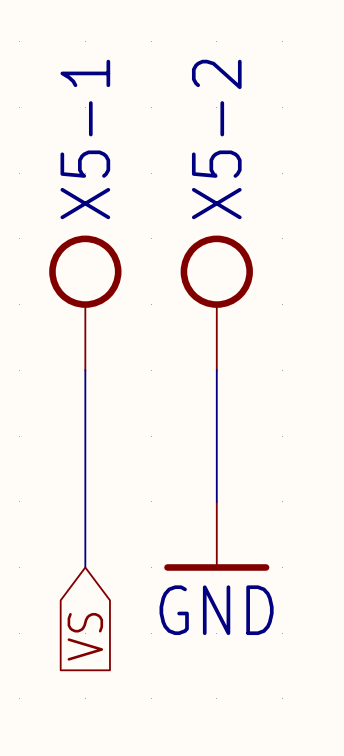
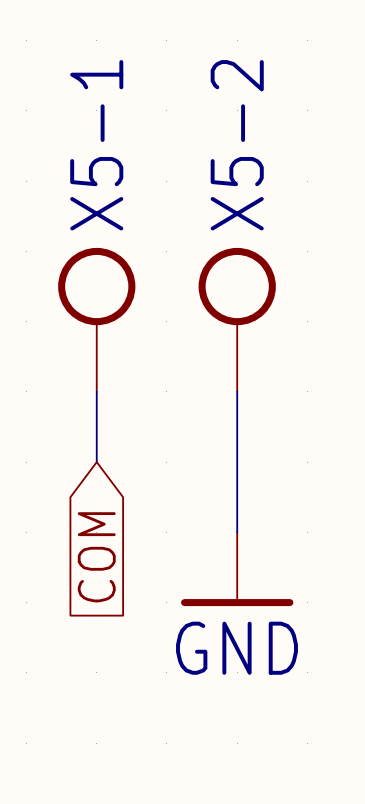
wire: (85, 436) (85, 567) -> none
global label: none -> COM (96, 557)
global label: VS (85, 636) -> none

